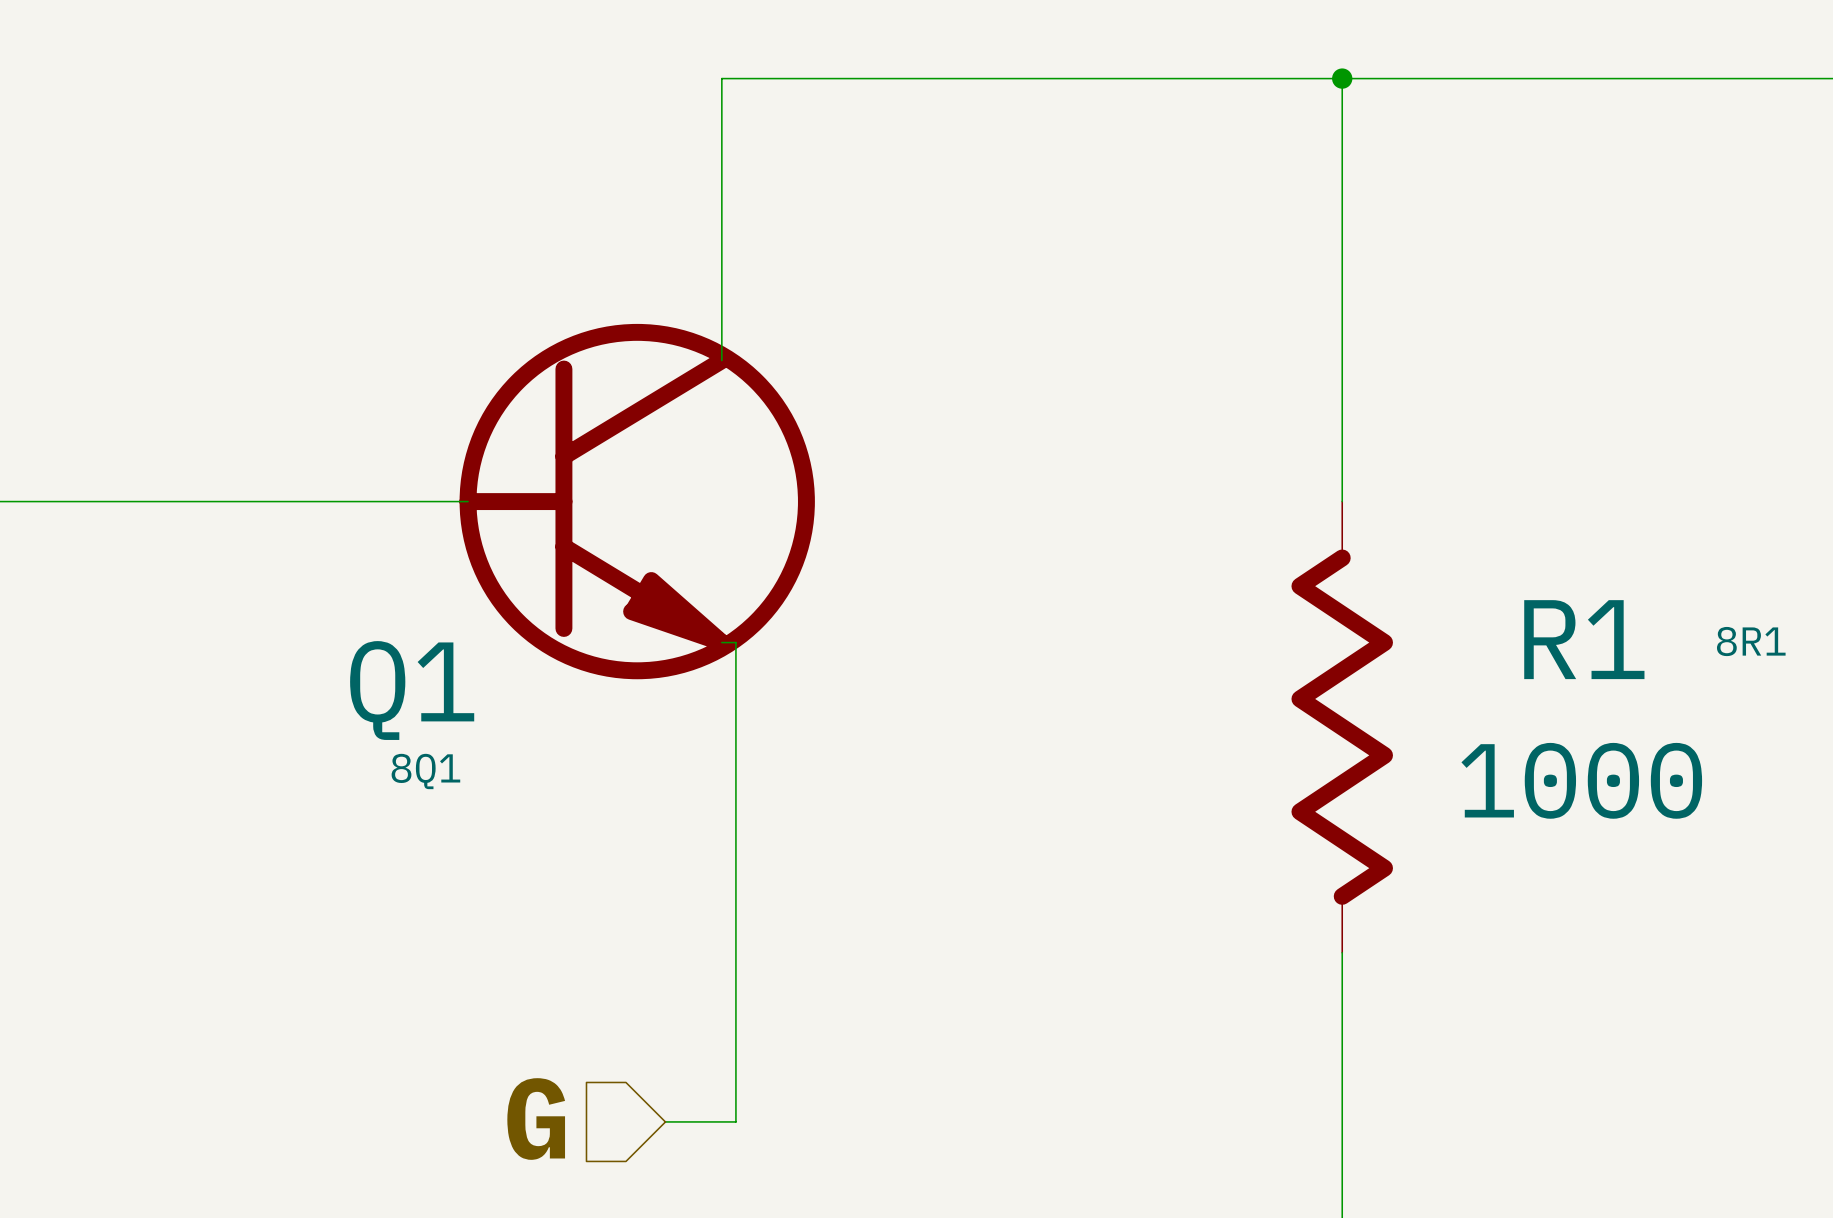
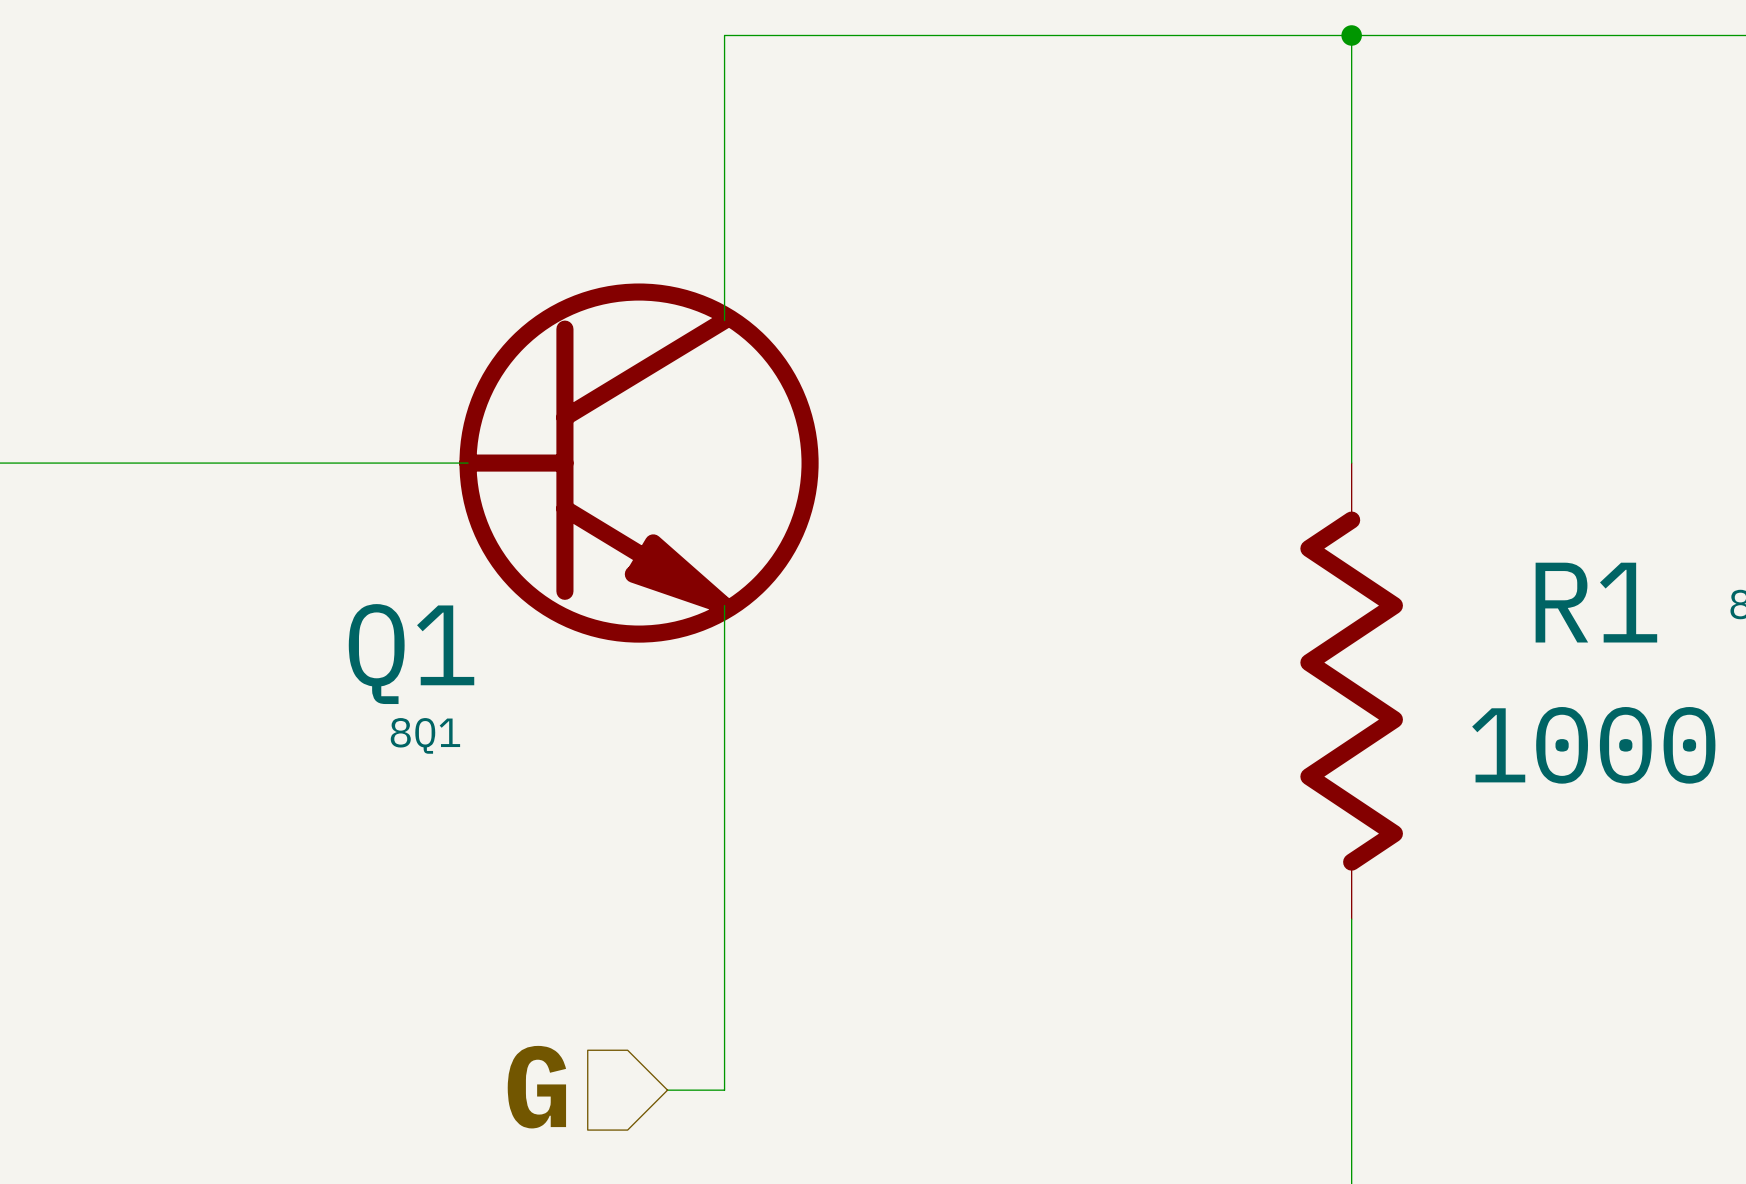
wire: (721, 642) (735, 642) (735, 1121) (721, 1121) -> (724, 605) (724, 1090)

